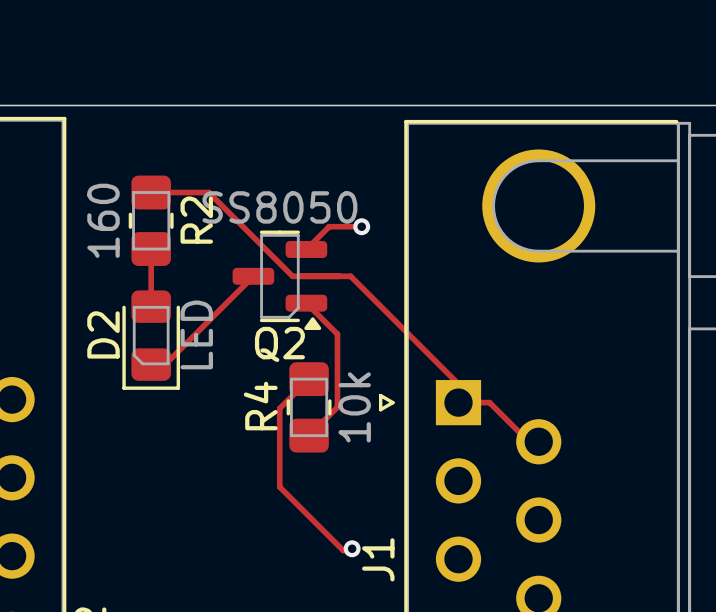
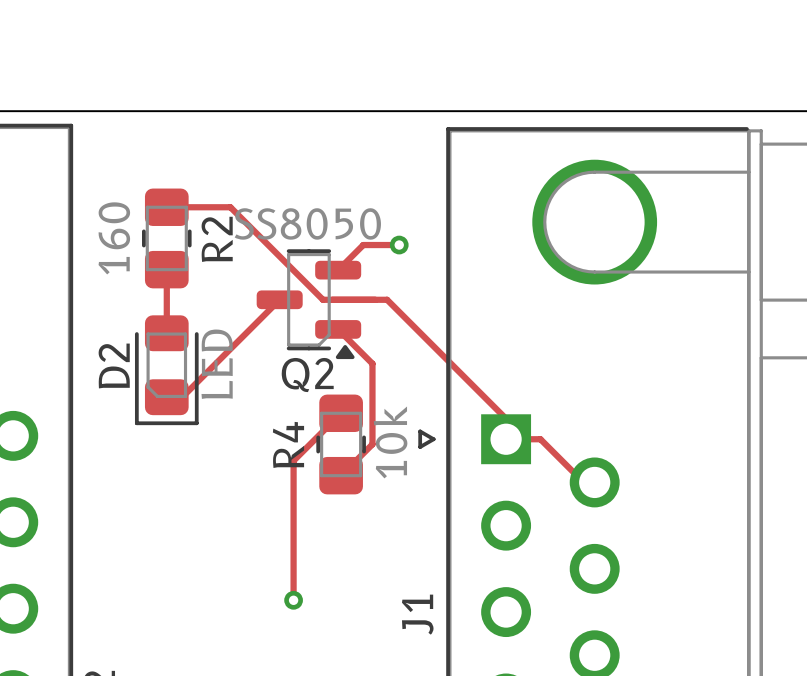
track: (279, 408) (279, 487) (343, 550) (352, 548) -> (308, 445) (293, 460) (293, 600)
via: none -> (293, 600)
via: (352, 548) -> none

